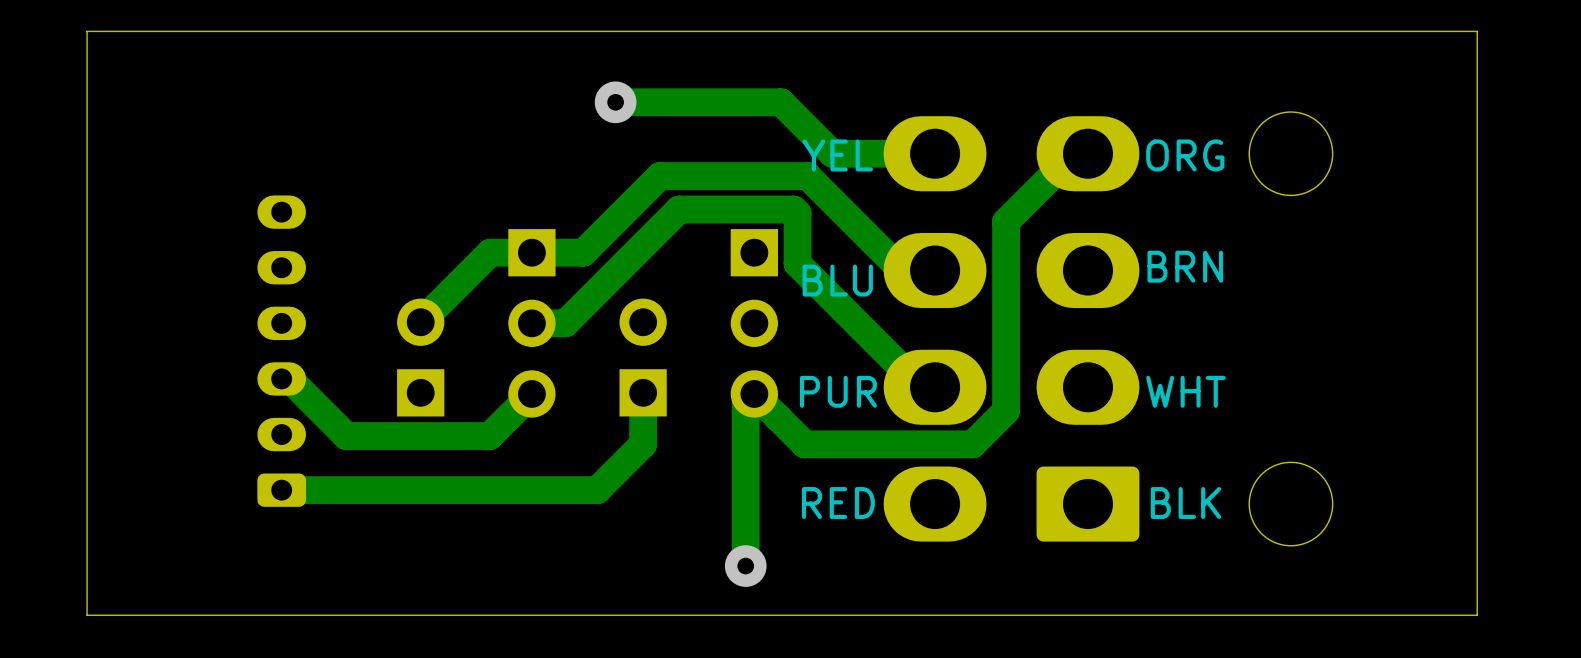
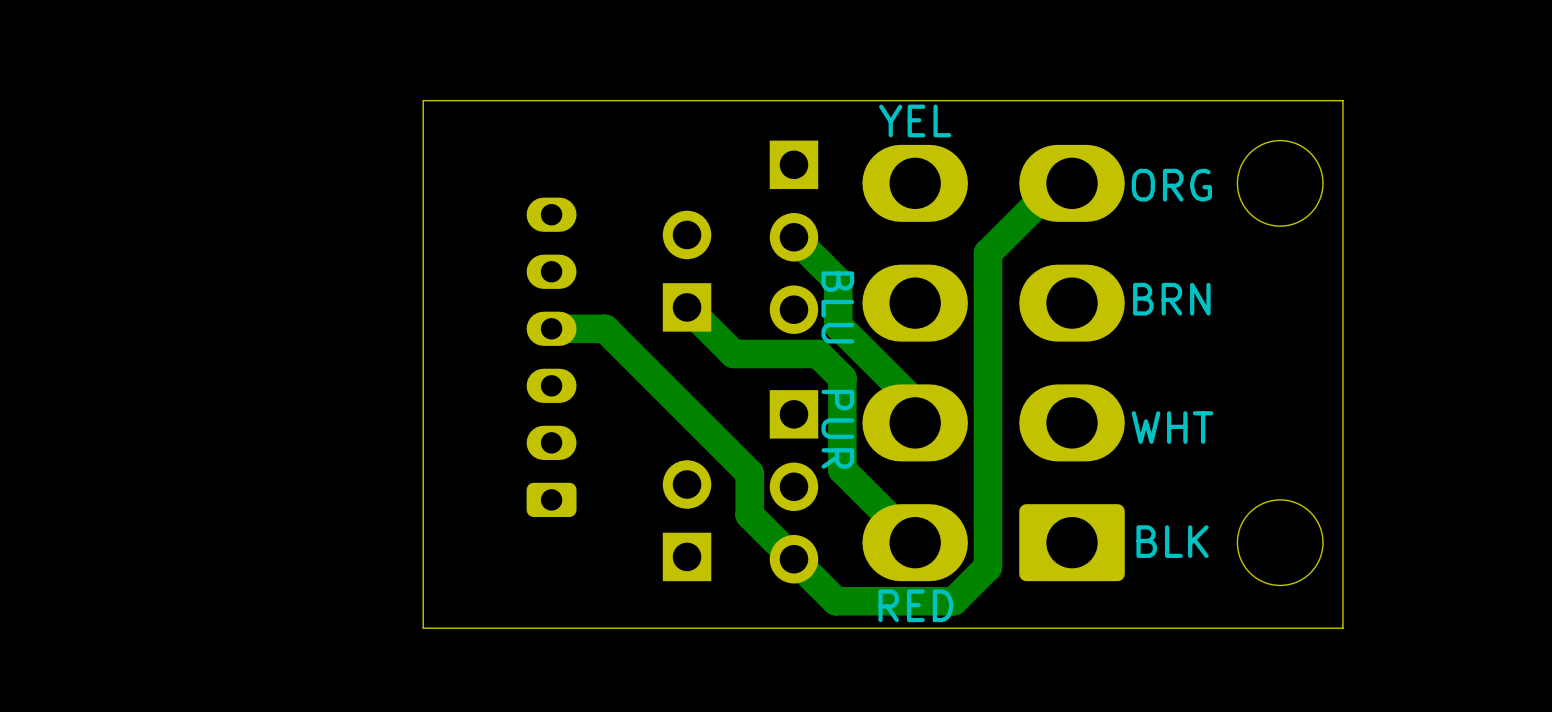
board edge: (1477, 31) (1477, 615) (87, 615) (87, 31) (1477, 31) -> (1342, 100) (1342, 628) (423, 628) (423, 100) (1342, 100)
track: (615, 102) (781, 102) (832, 153) (935, 153) -> none
via: (615, 102) -> none
text position: YEL (837, 155) -> YEL (915, 120)
part: none -> (793, 237)
part: none -> (687, 271)
track: (935, 270) (901, 270) (807, 176) (660, 176) (583, 252) (490, 252) (420, 322) -> none
track: none -> (687, 307) (733, 353) (818, 353) (842, 378) (842, 469) (915, 542)
text rotation: 0° (837, 280) -> 90° clockwise (837, 307)
track: (531, 323) (565, 323) (679, 209) (793, 209) (797, 213) (797, 263) (921, 387) (935, 387) -> (793, 237) (838, 281) (838, 325) (915, 402) (915, 422)
part: (531, 323) -> none
part: (754, 323) -> none
part position: (281, 351) -> (551, 357)
part: (420, 357) -> none
part: (643, 357) -> none
track: (281, 378) (289, 378) (346, 436) (489, 436) (531, 393) -> none
text rotation: 0° (838, 391) -> 90° clockwise (837, 429)
track: (643, 392) (643, 444) (597, 490) (281, 490) -> none
track: (1006, 410) (972, 444) (804, 444) (754, 393) (745, 402) (745, 566) -> (987, 447) (987, 566) (953, 601) (835, 601) (749, 514) (749, 473) (605, 328) (551, 328)
part: none -> (793, 486)
part: none -> (687, 520)
text position: RED (838, 503) -> RED (915, 605)
via: (745, 566) -> none

